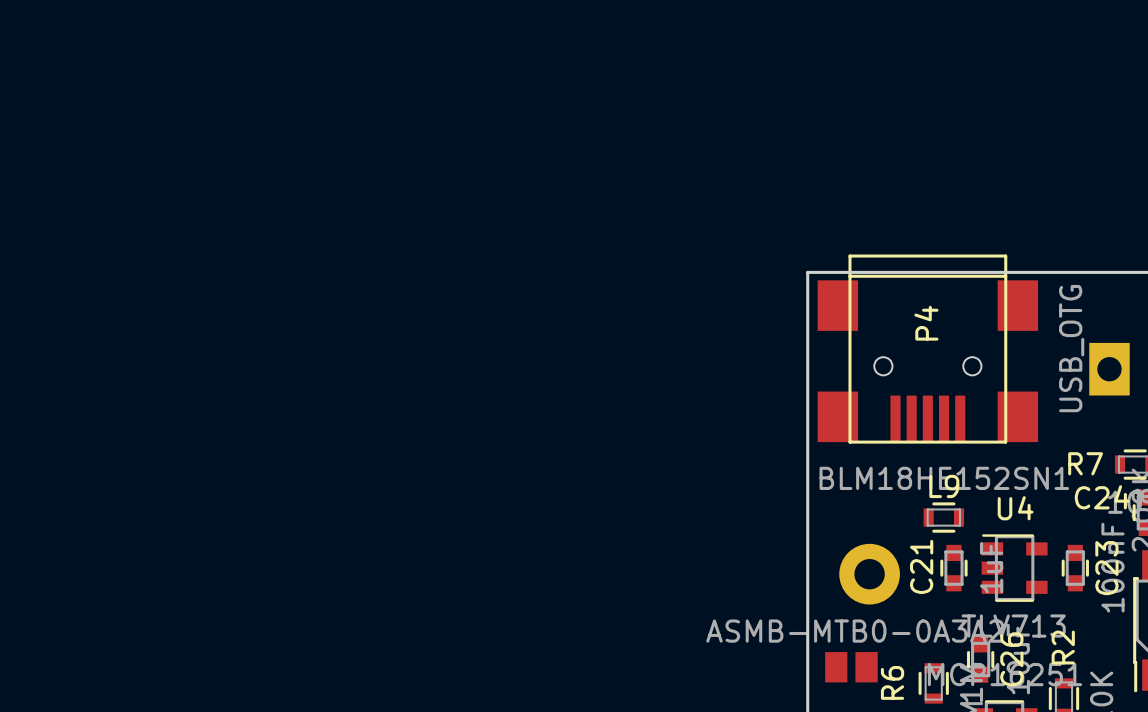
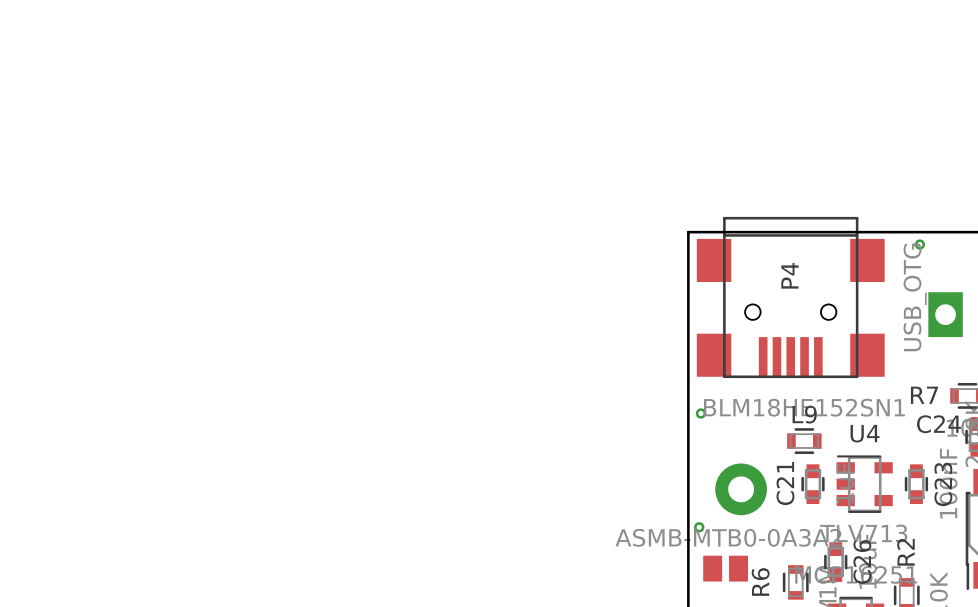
part: none -> (919, 244)
part: none -> (700, 413)
part: none -> (699, 527)

